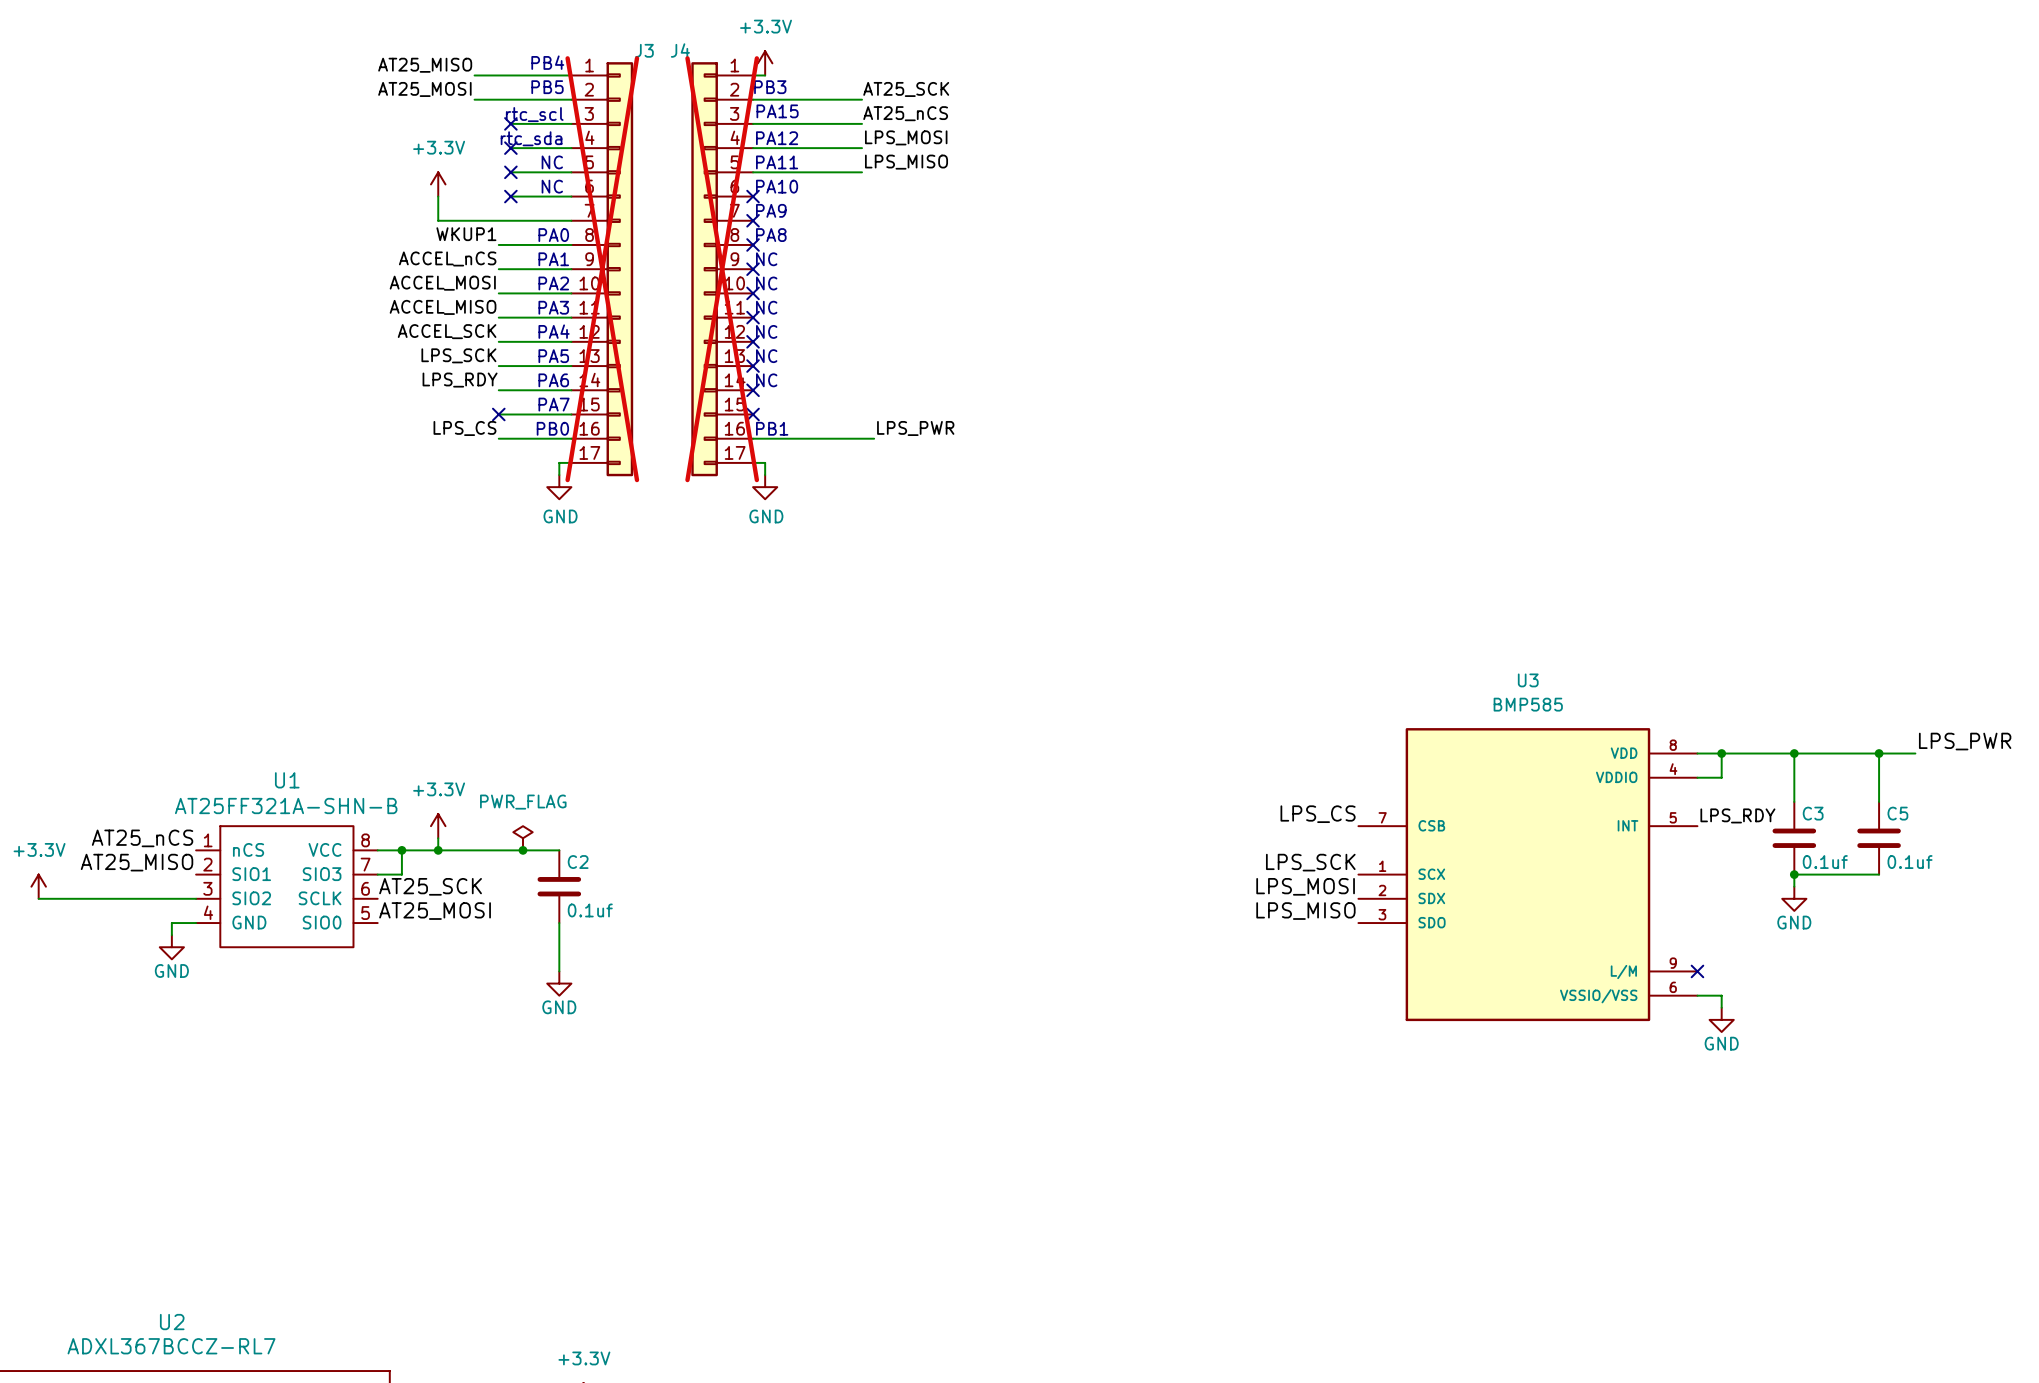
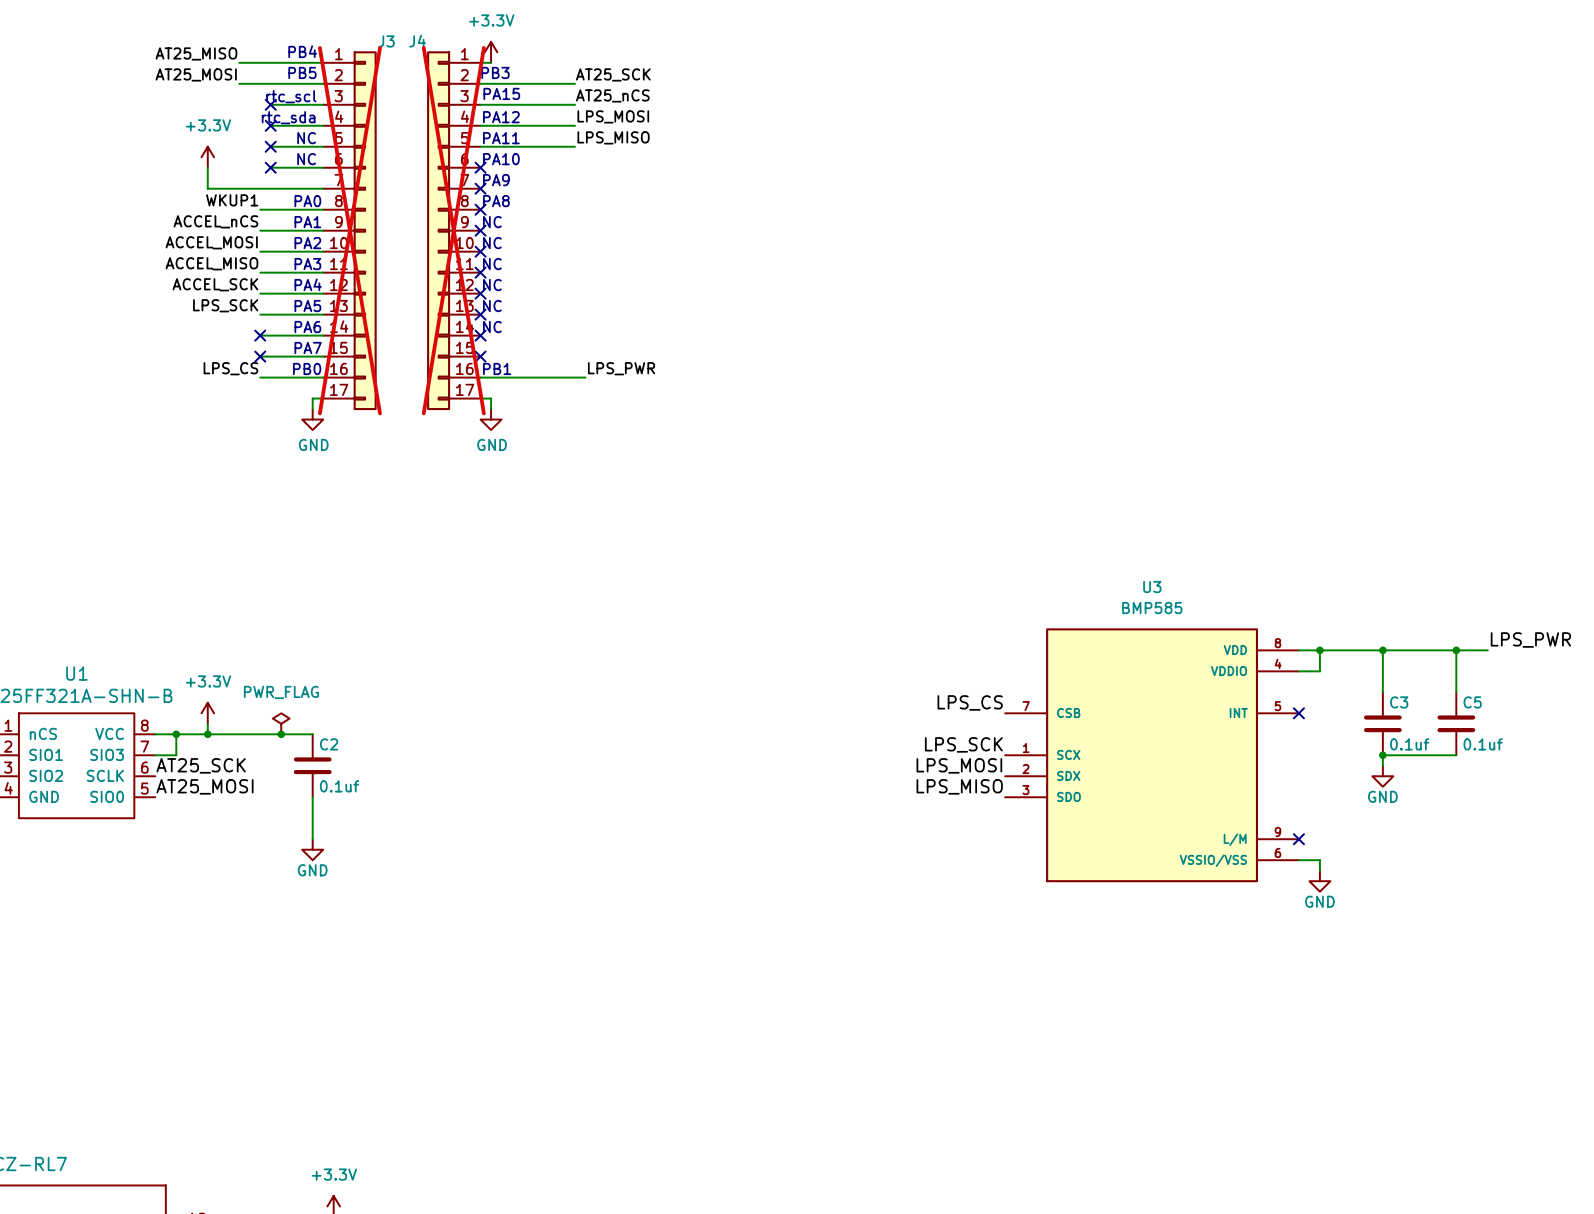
label: LPS_RDY (460, 380) -> none
no-connect mark: none -> (260, 335)
label: LPS_RDY (1737, 815) -> none
no-connect mark: none -> (1298, 713)

